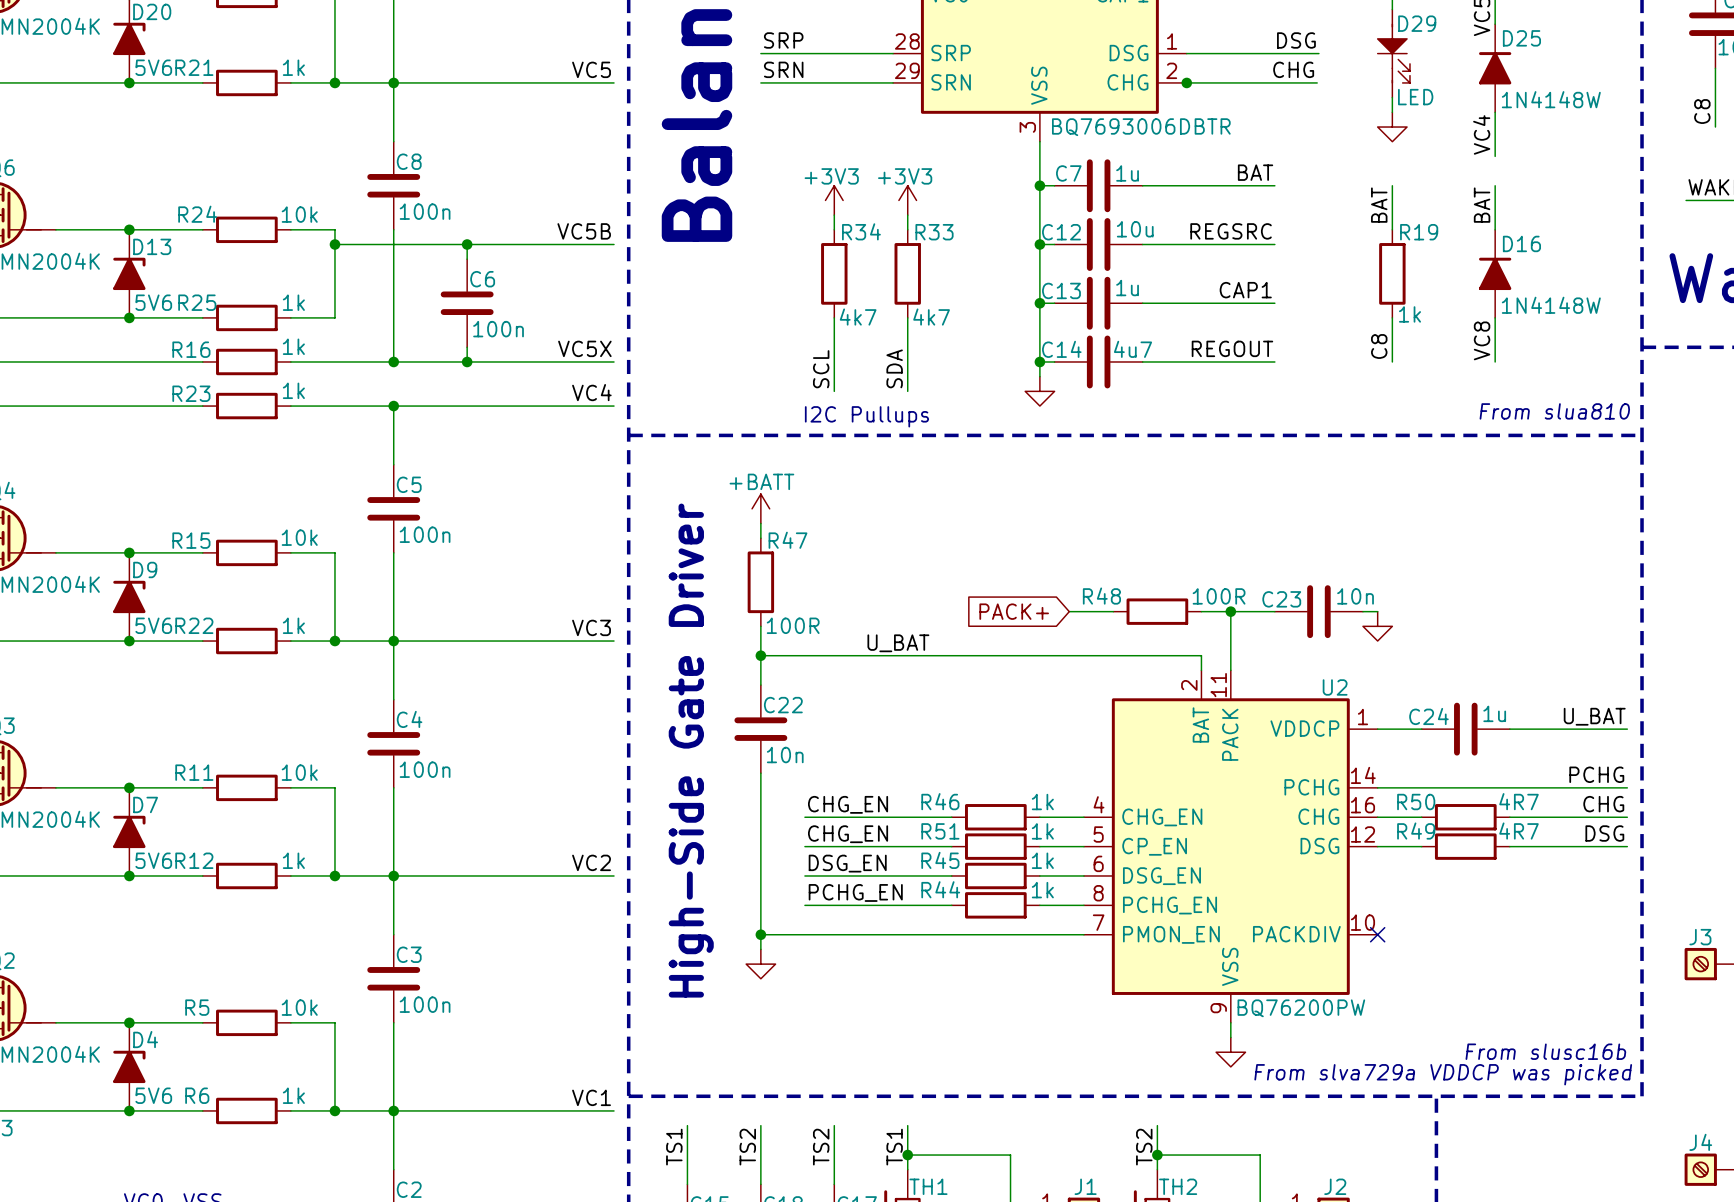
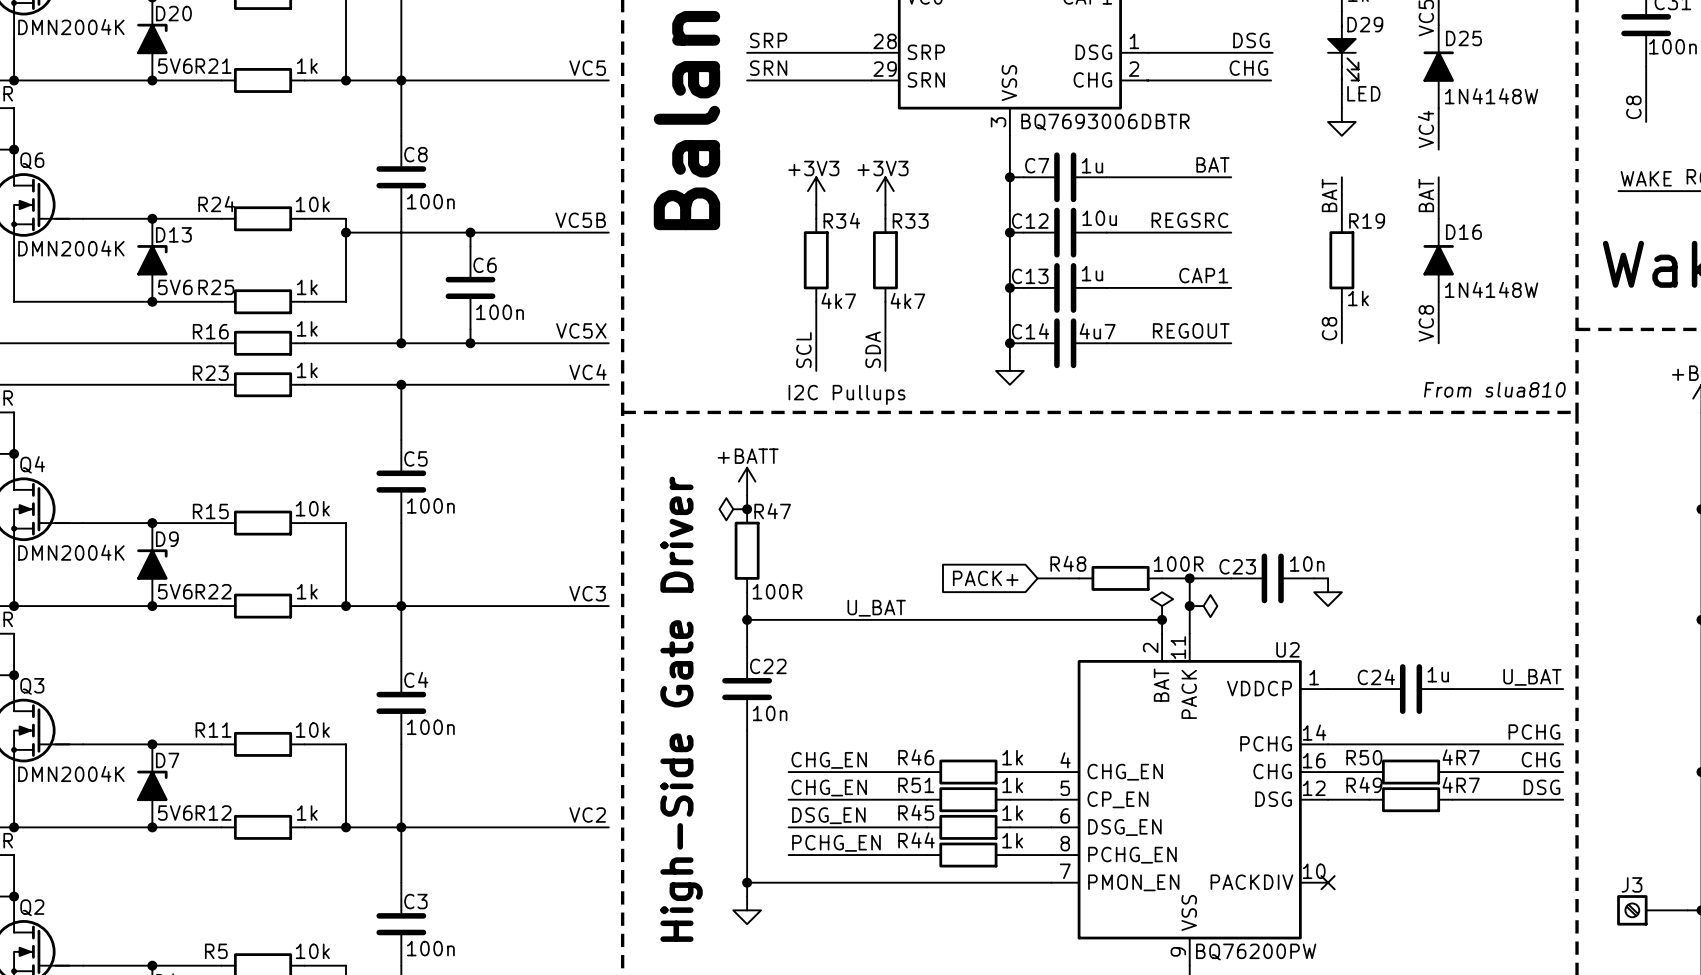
junction: (1186, 82) -> none
power symbol: none -> (733, 509)
junction: none -> (747, 509)
power symbol: none -> (1162, 606)
junction: none -> (1189, 606)
power symbol: none -> (1203, 606)
junction: none -> (1162, 619)

